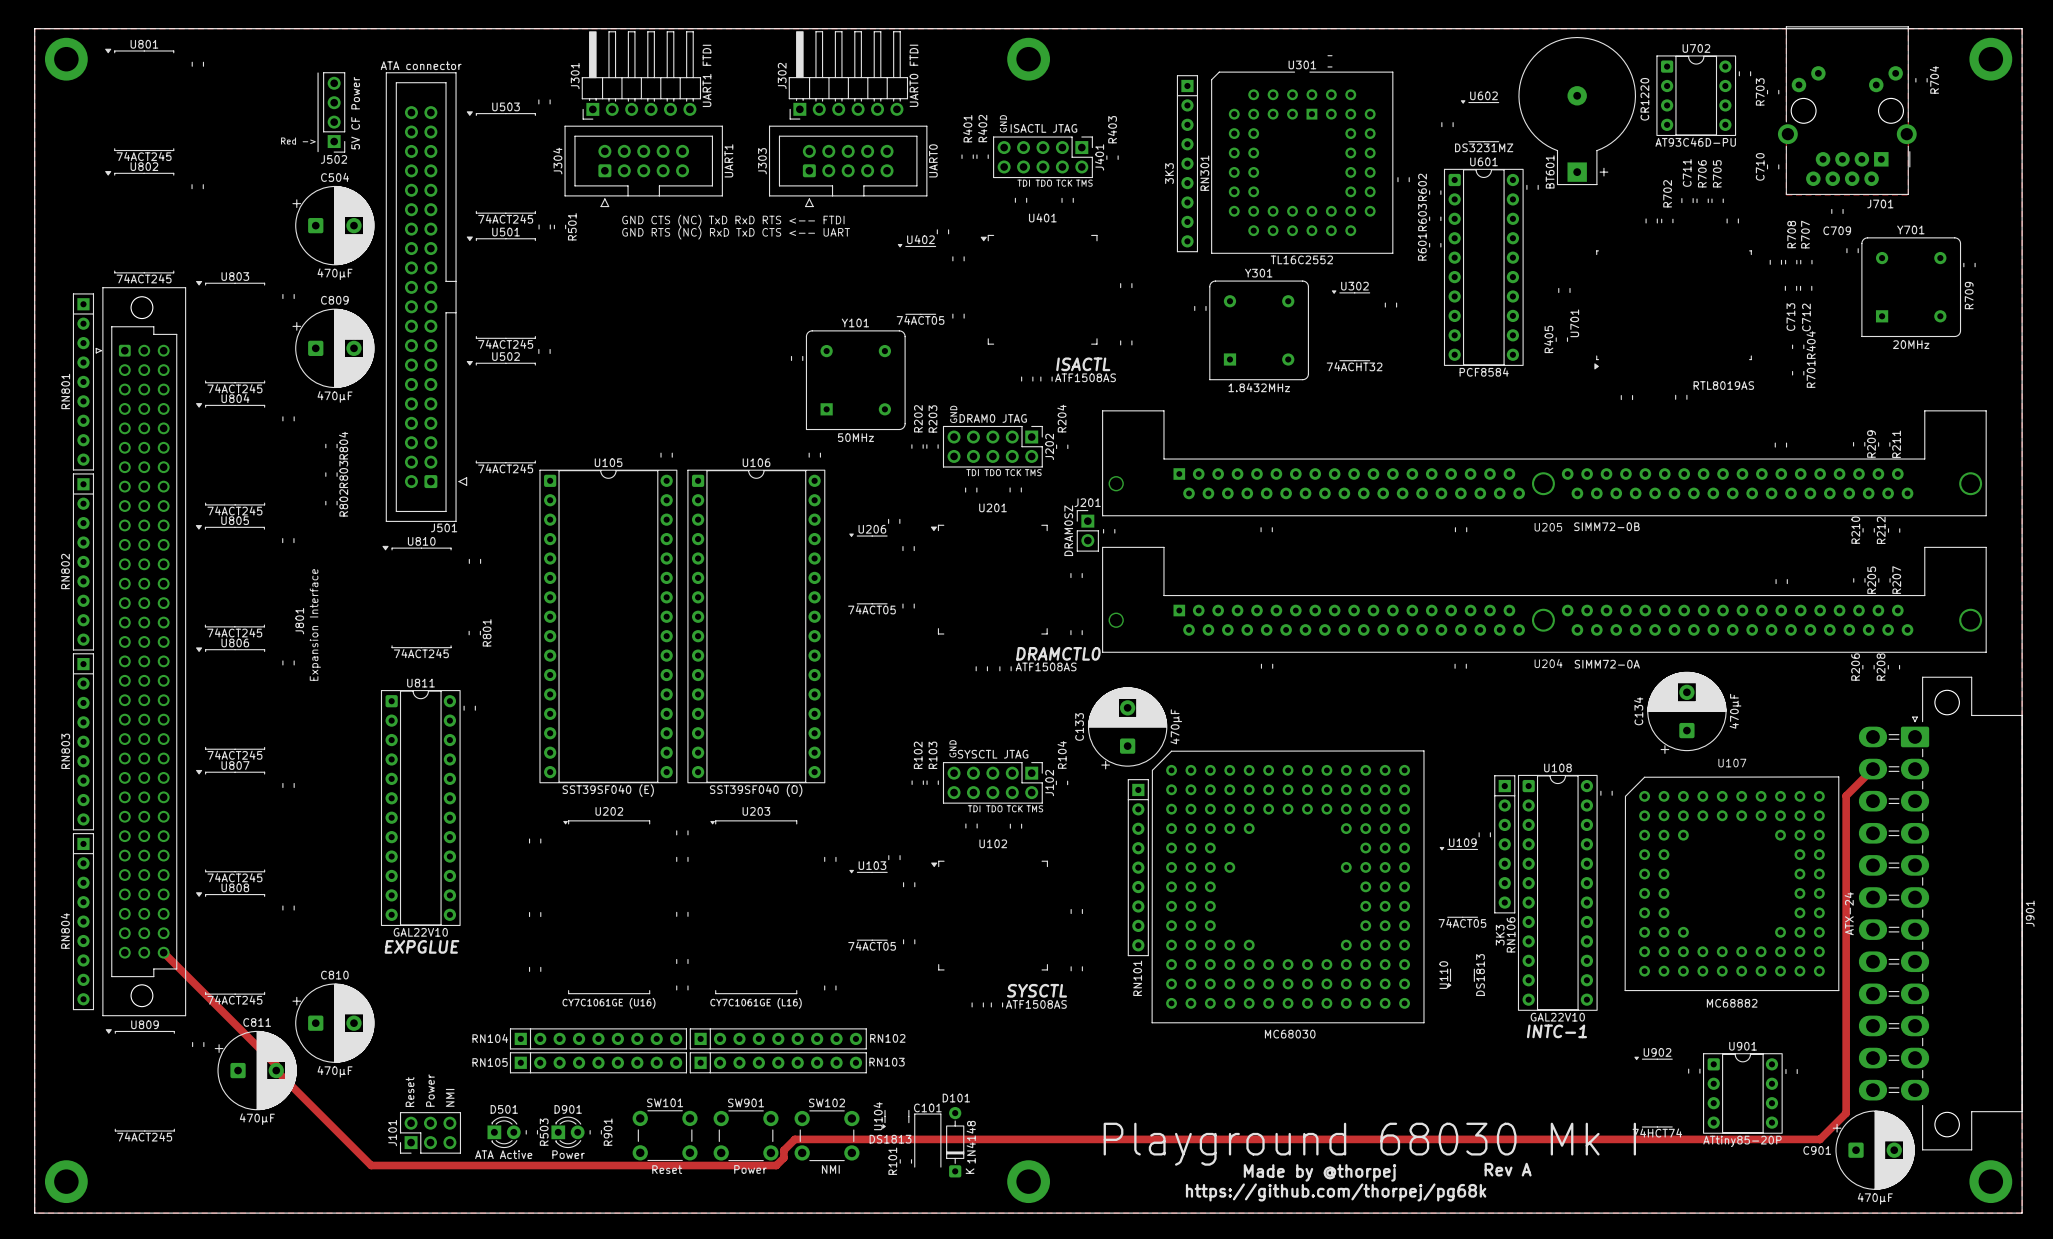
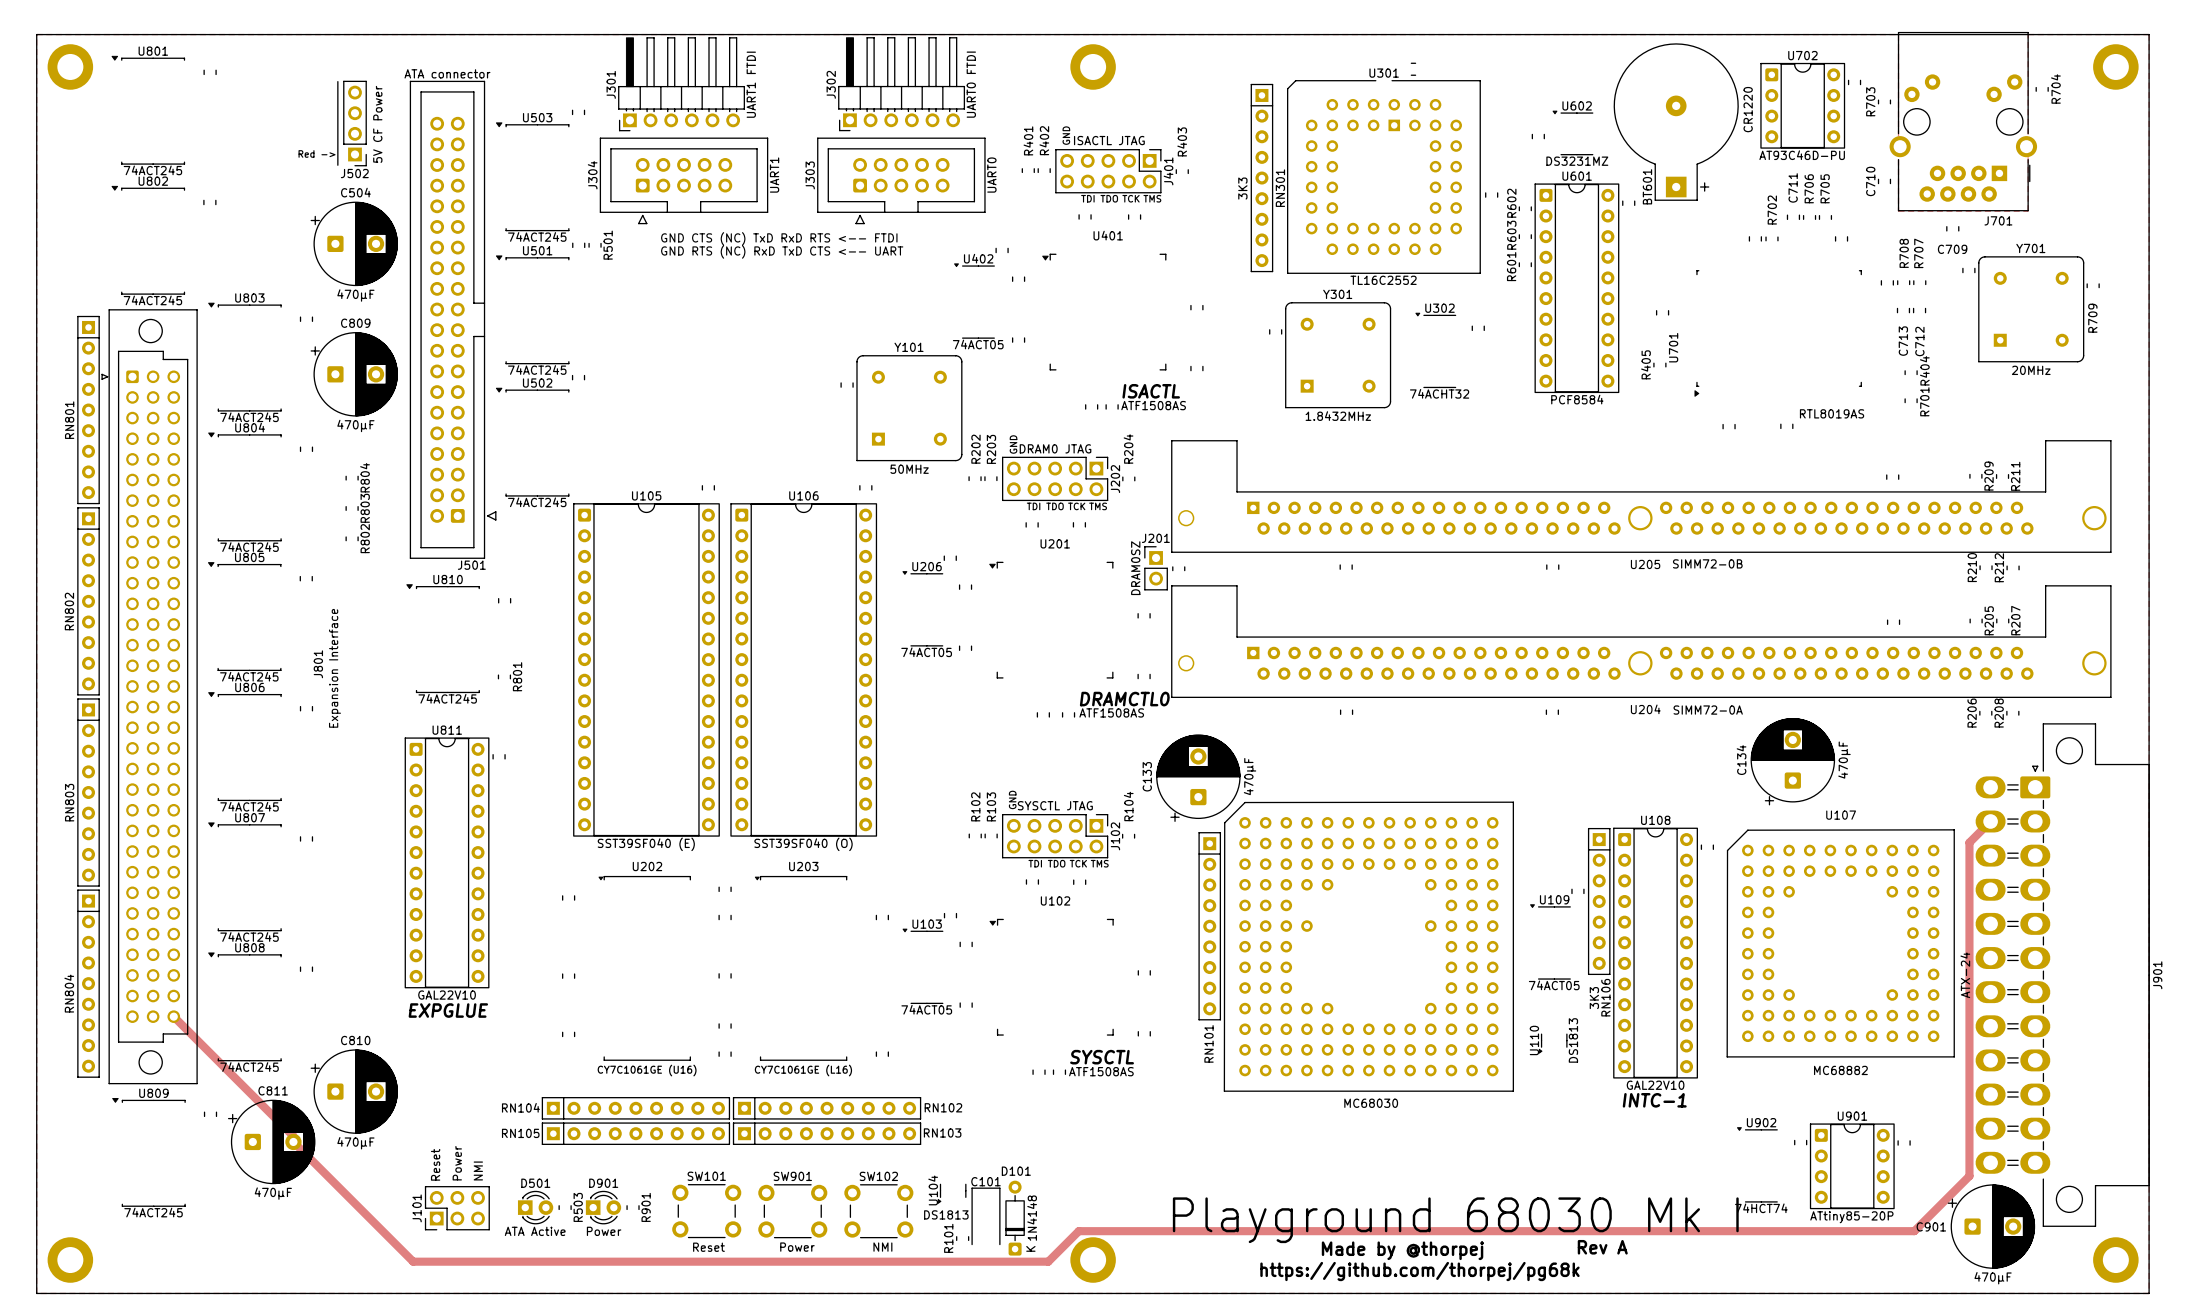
track: (1853, 788) (1846, 795) (1846, 1113) (1819, 1139) -> none
track: (1819, 1139) (794, 1139) (783, 1150) (783, 1157) (776, 1165) (371, 1165) -> (1969, 842) (1969, 1176) (1914, 1231) (1078, 1231) (1048, 1261) (413, 1261) (394, 1242)

